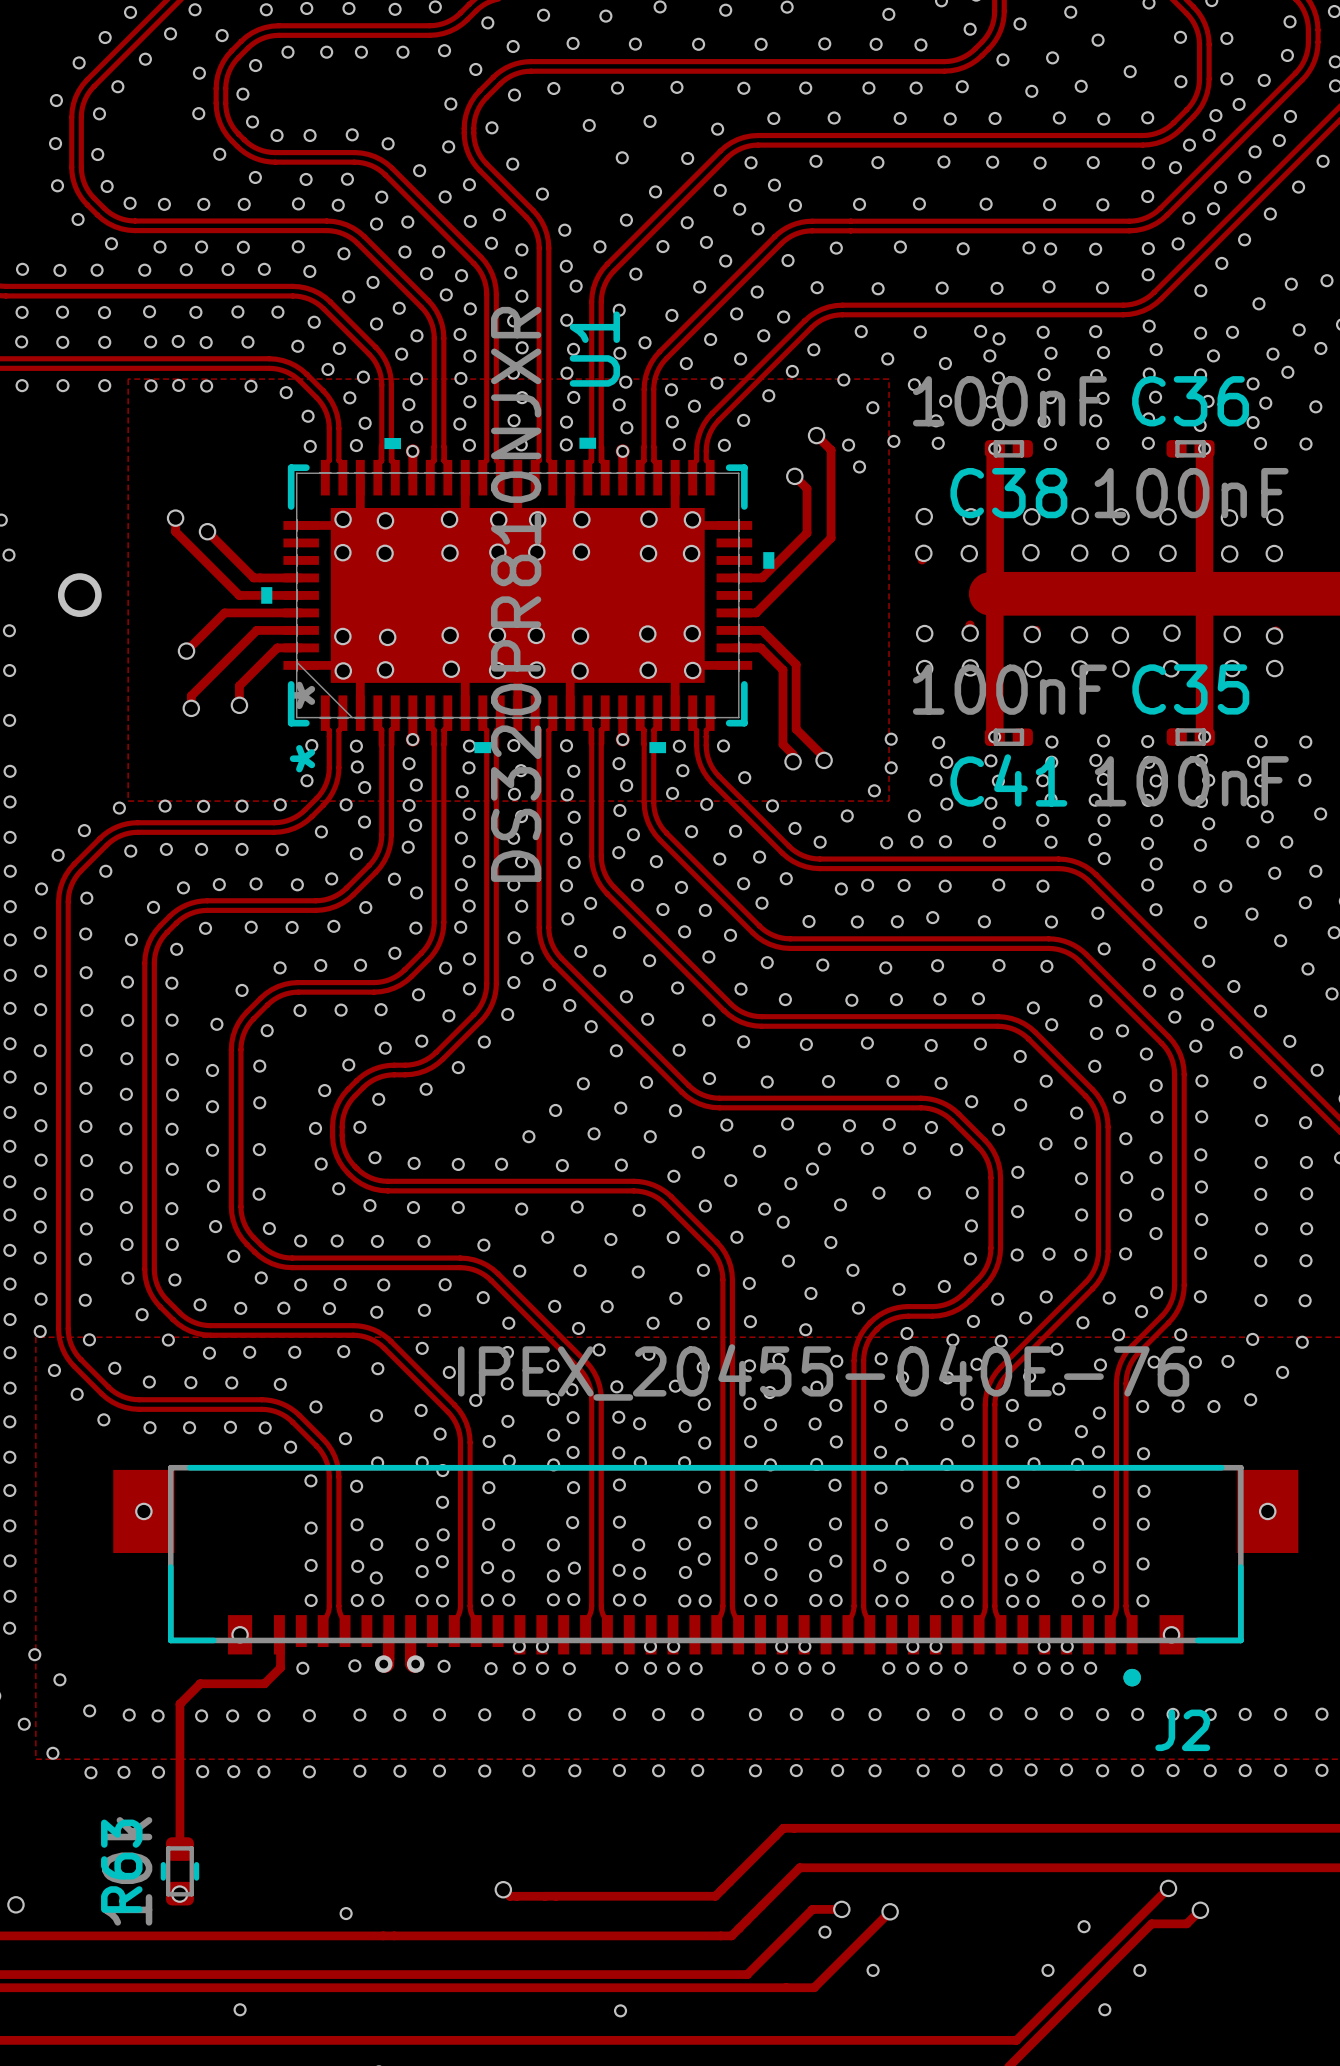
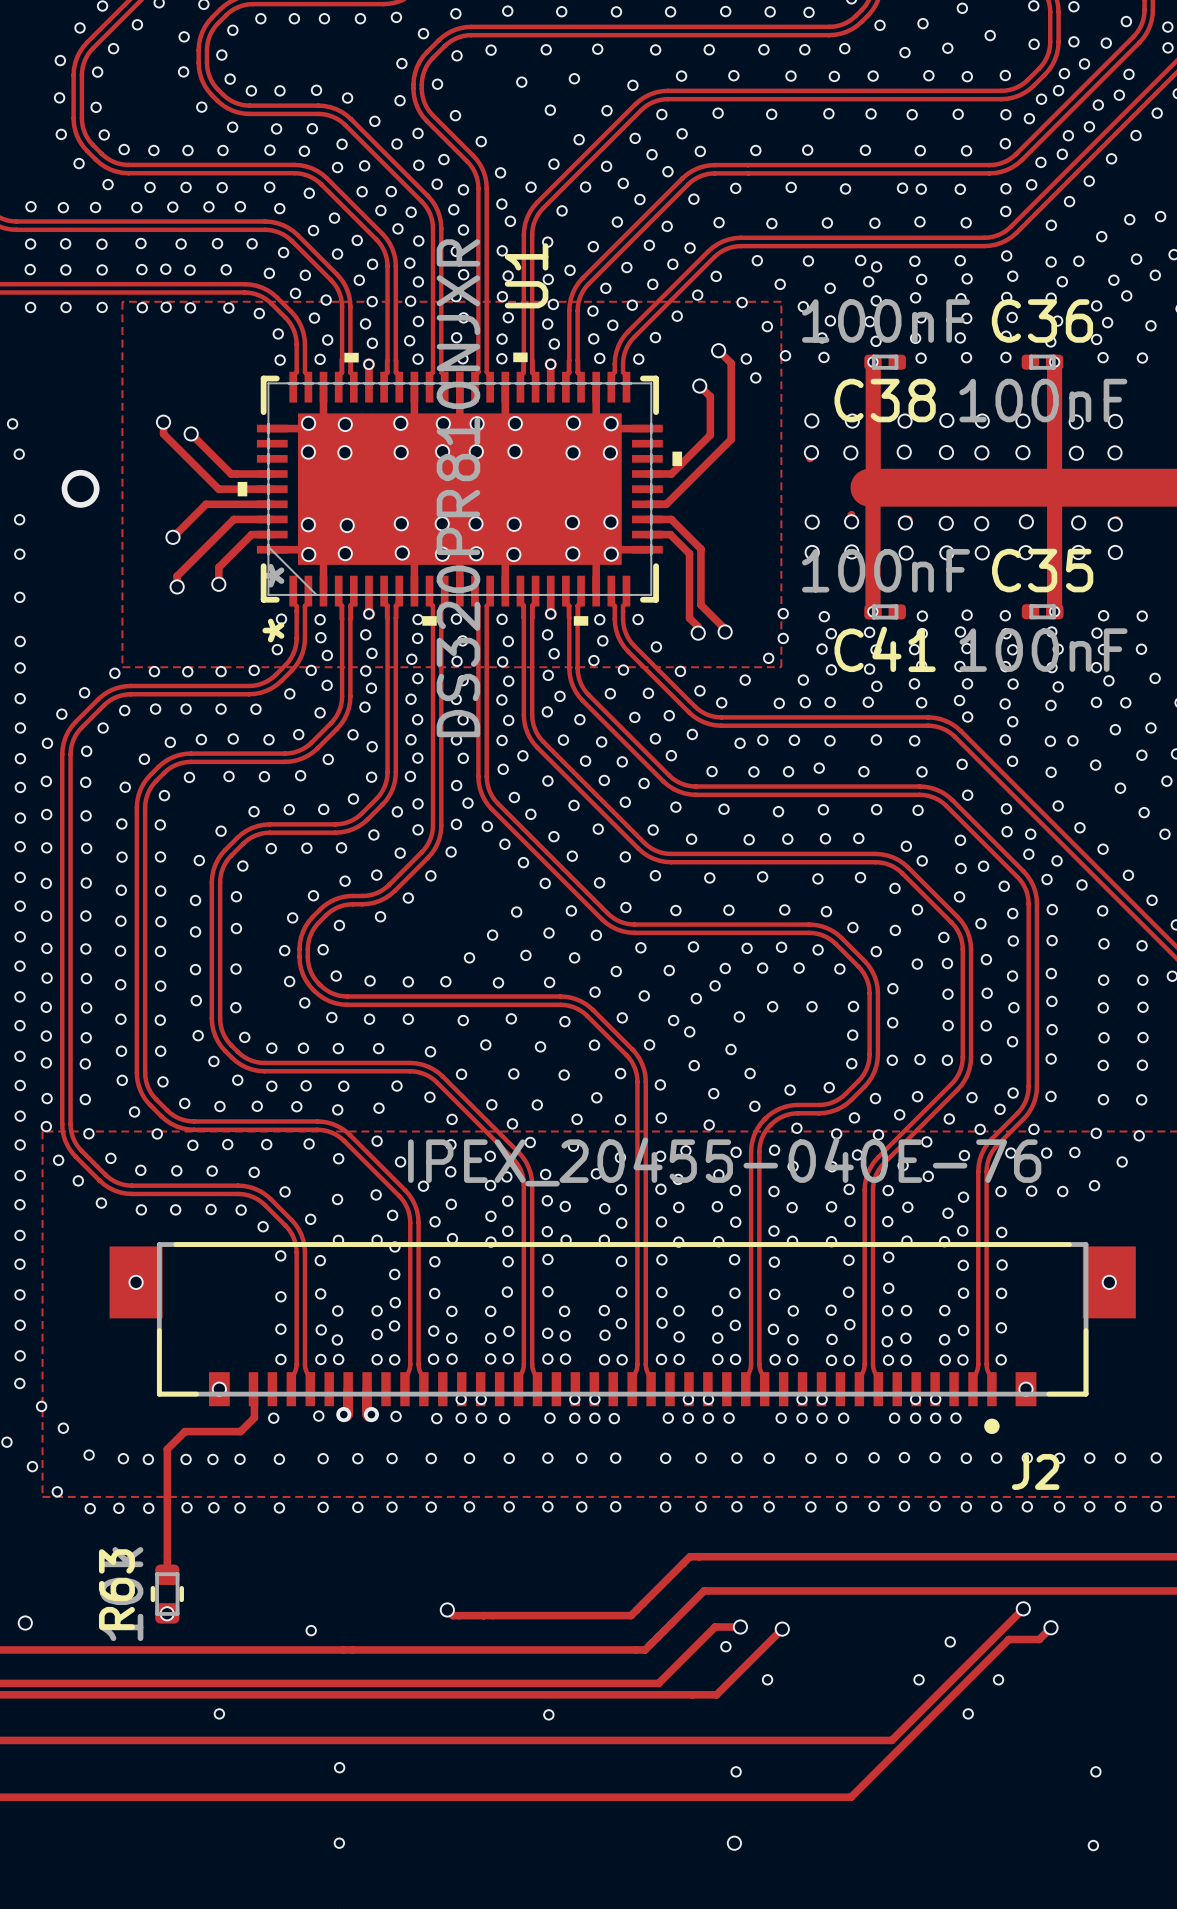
J2 footprint: [113, 1464, 1299, 1687] -> [109, 1242, 1136, 1434]

